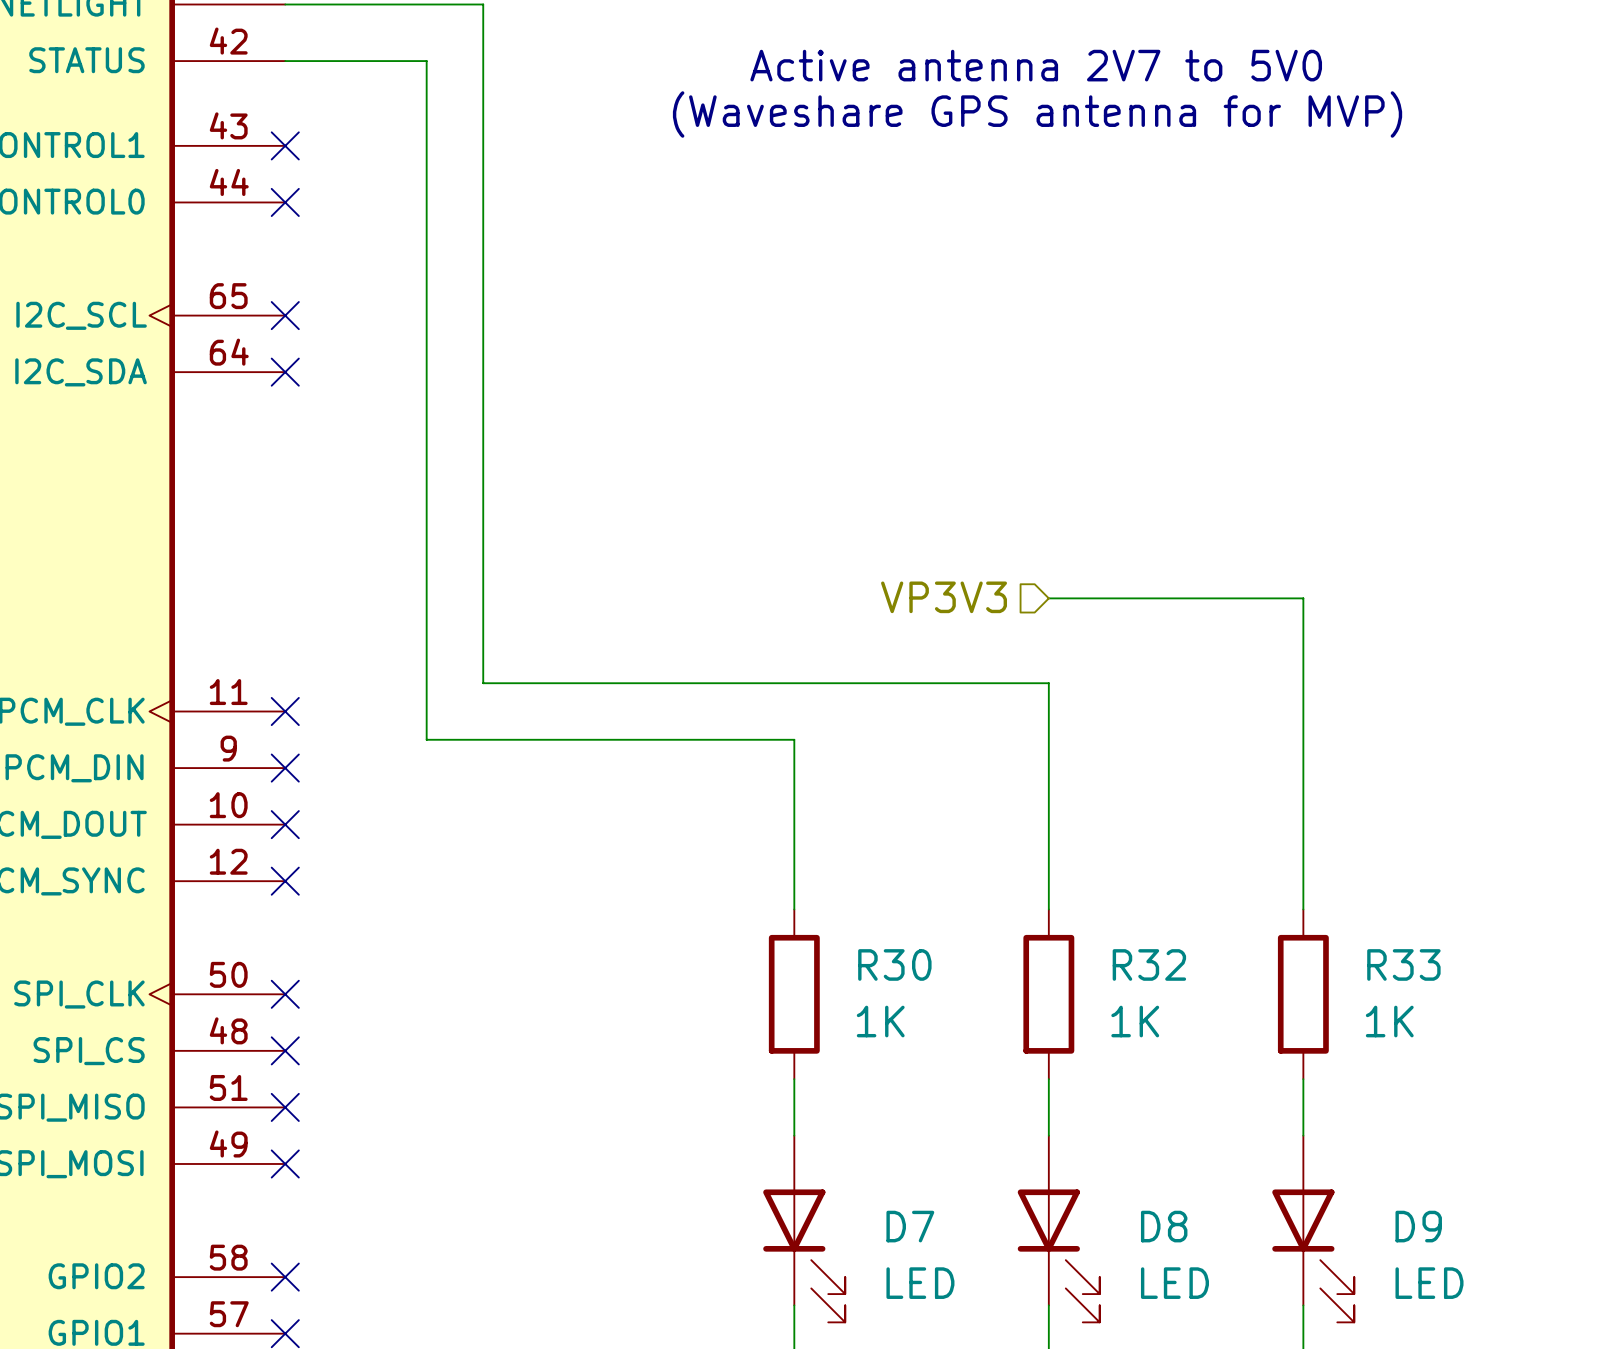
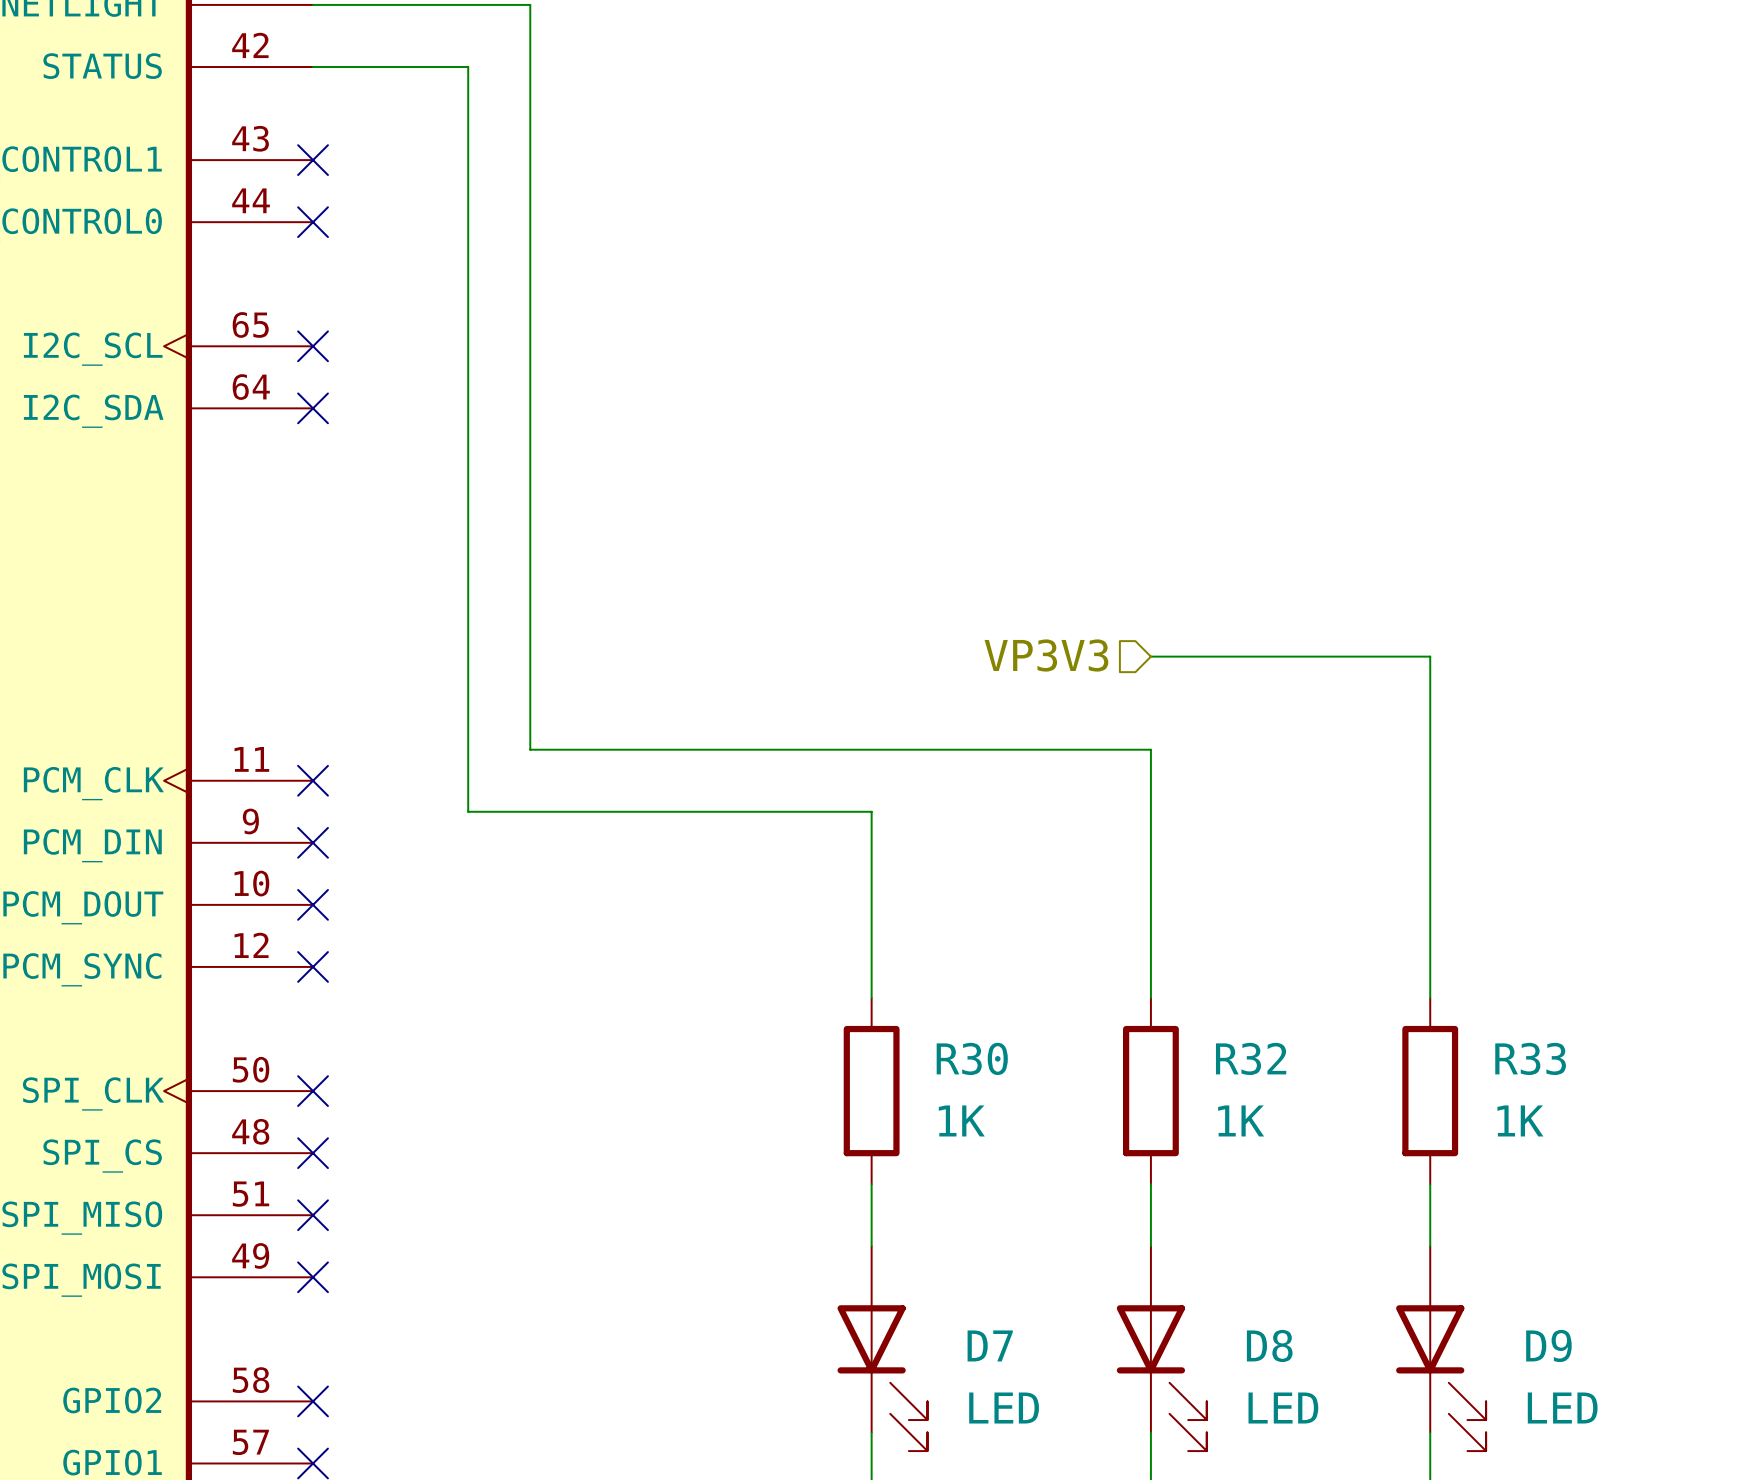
text: Active antenna 2V7 to 5V0 (1036, 65) -> none
text: (Waveshare GPS antenna for MVP) (1037, 114) -> none

